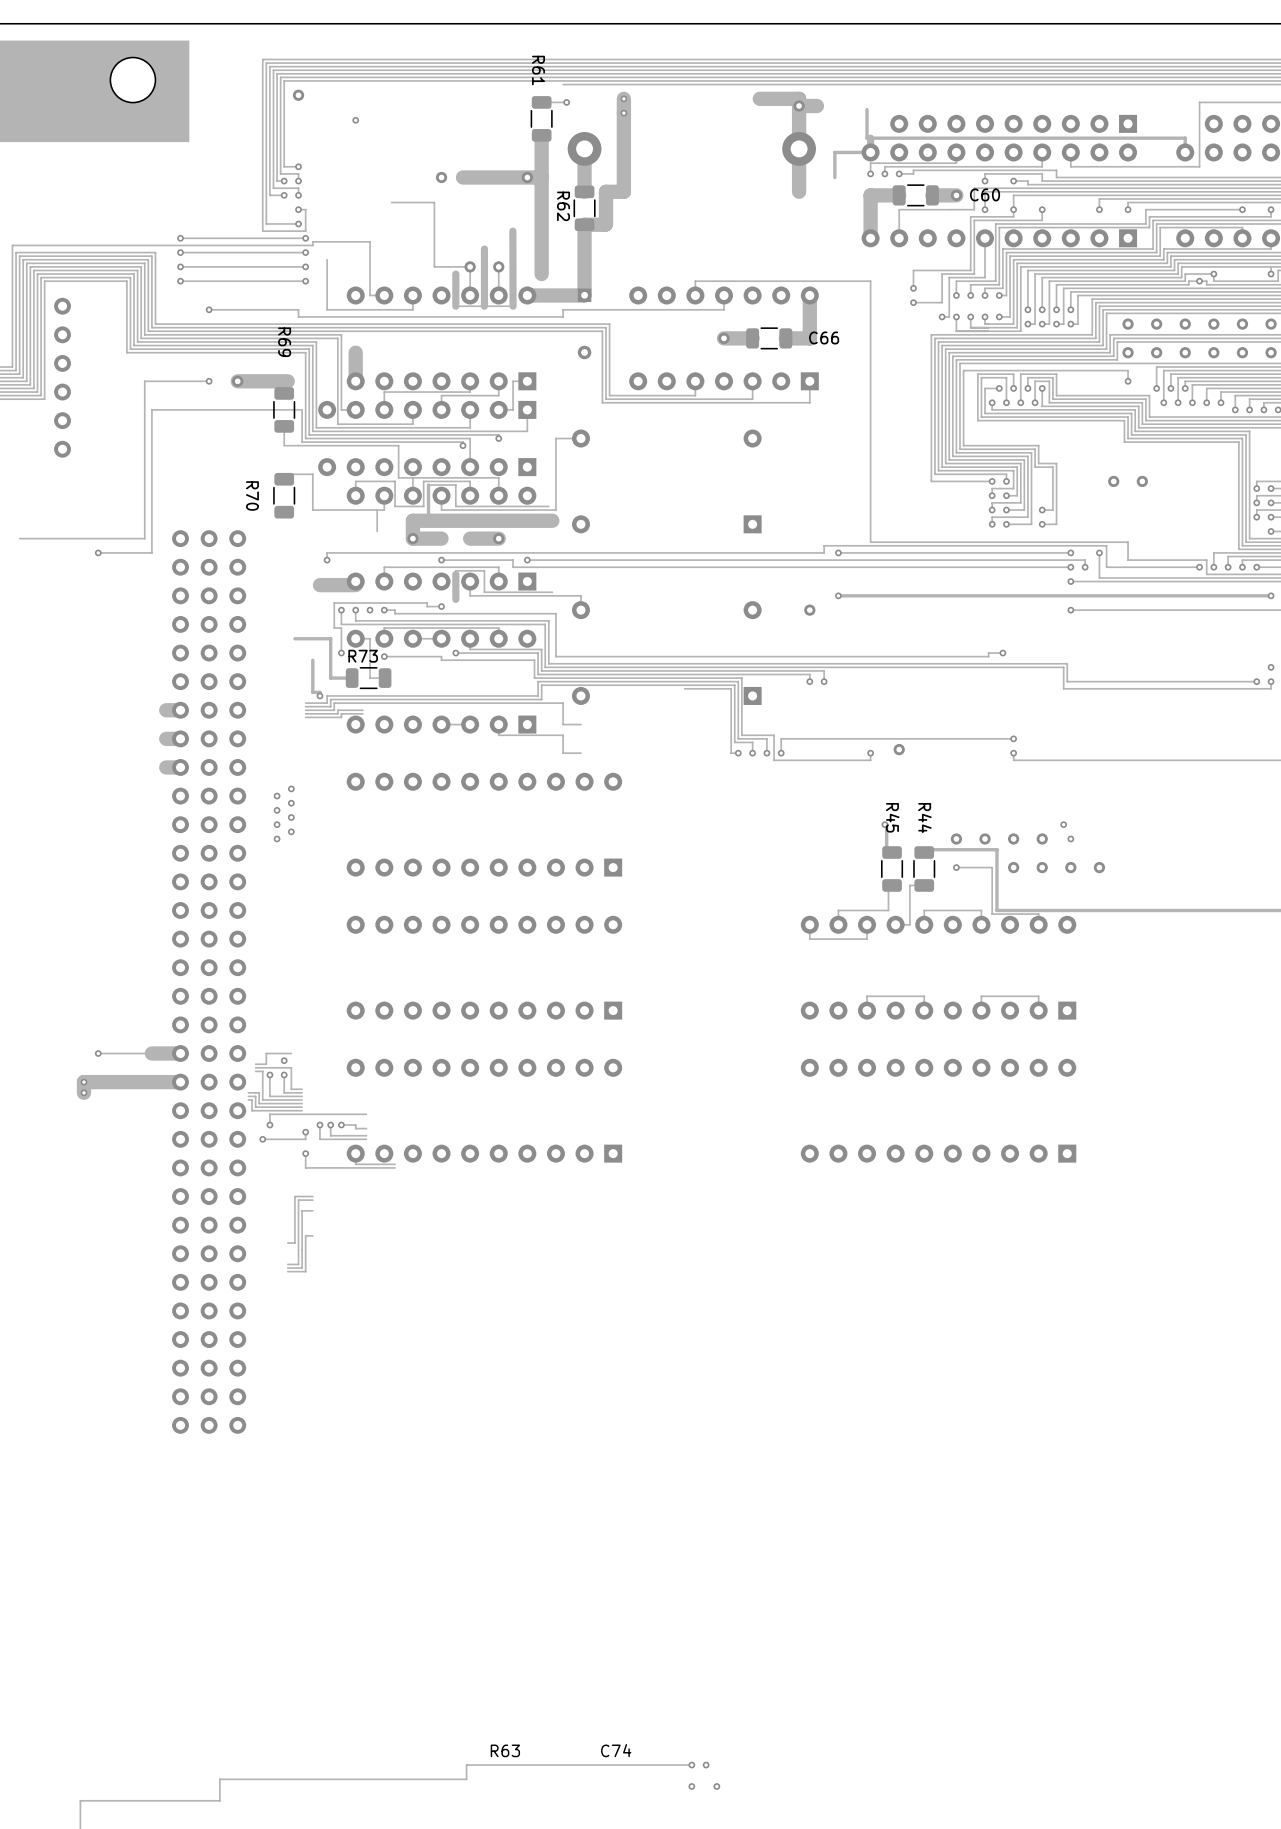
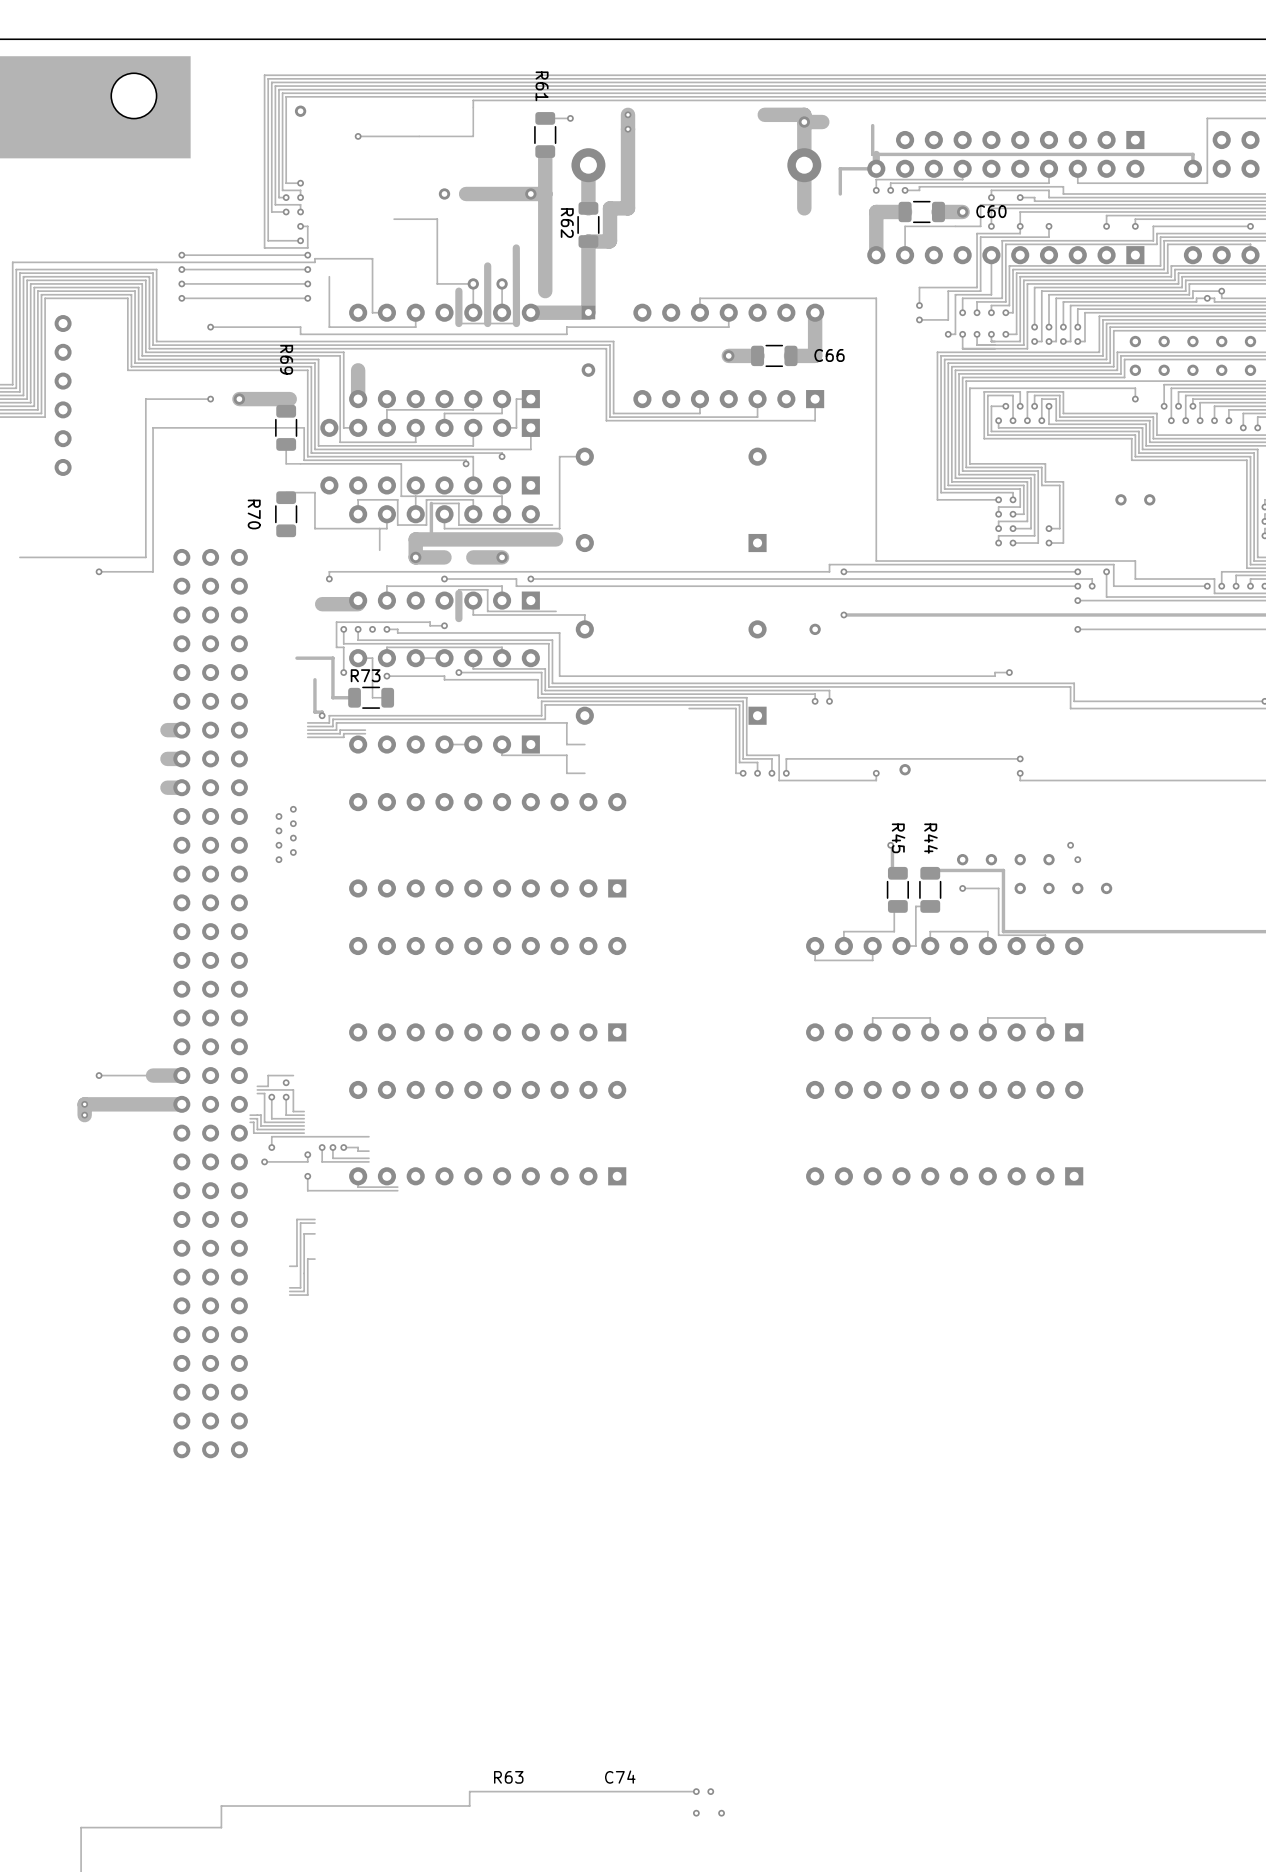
track: none -> (566, 100) (473, 100) (473, 136) (358, 136)

